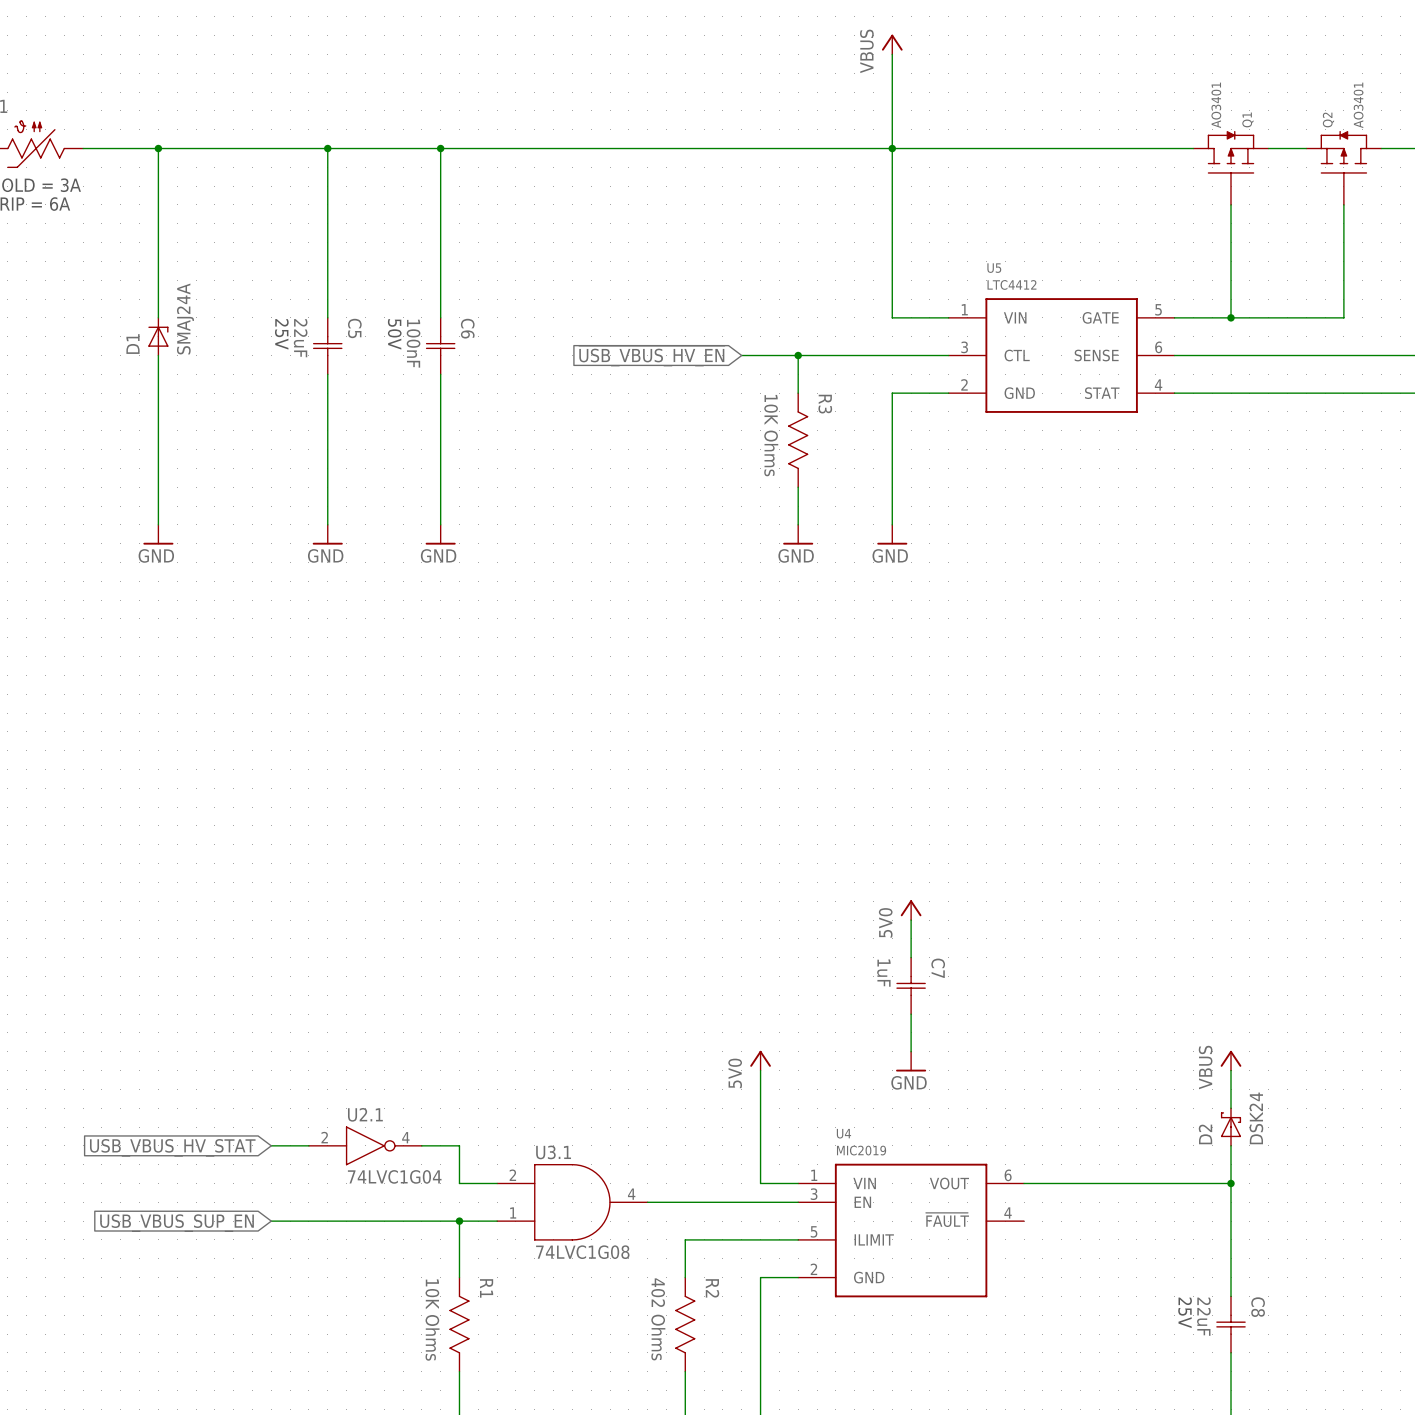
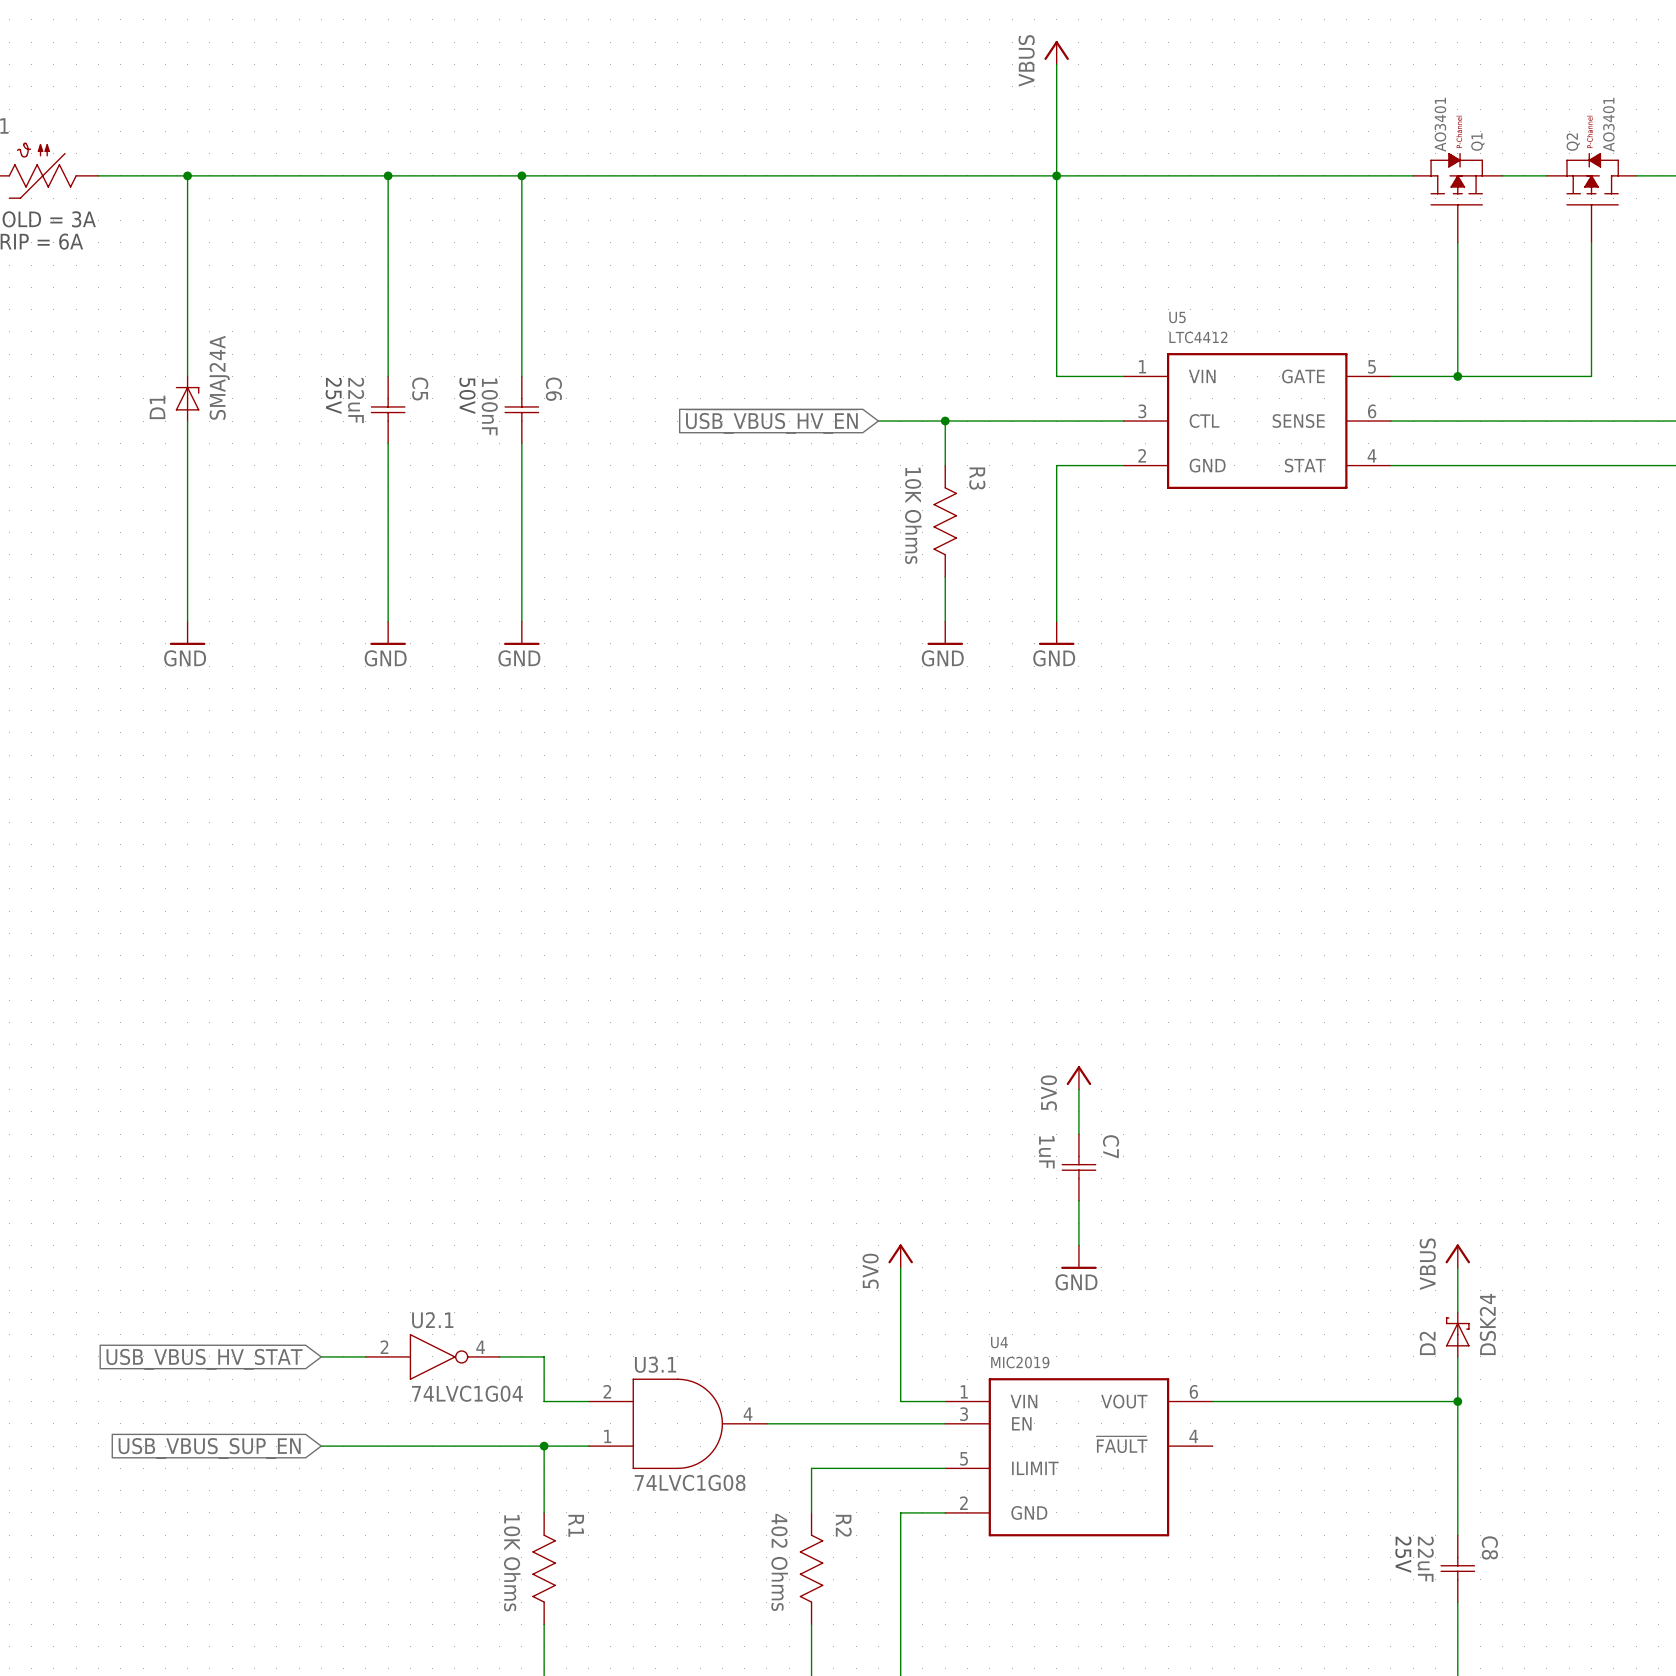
Q1 symbol: [1192, 131, 1270, 206] -> [1412, 152, 1504, 244]
Q2 symbol: [1305, 131, 1383, 206] -> [1546, 152, 1637, 244]

